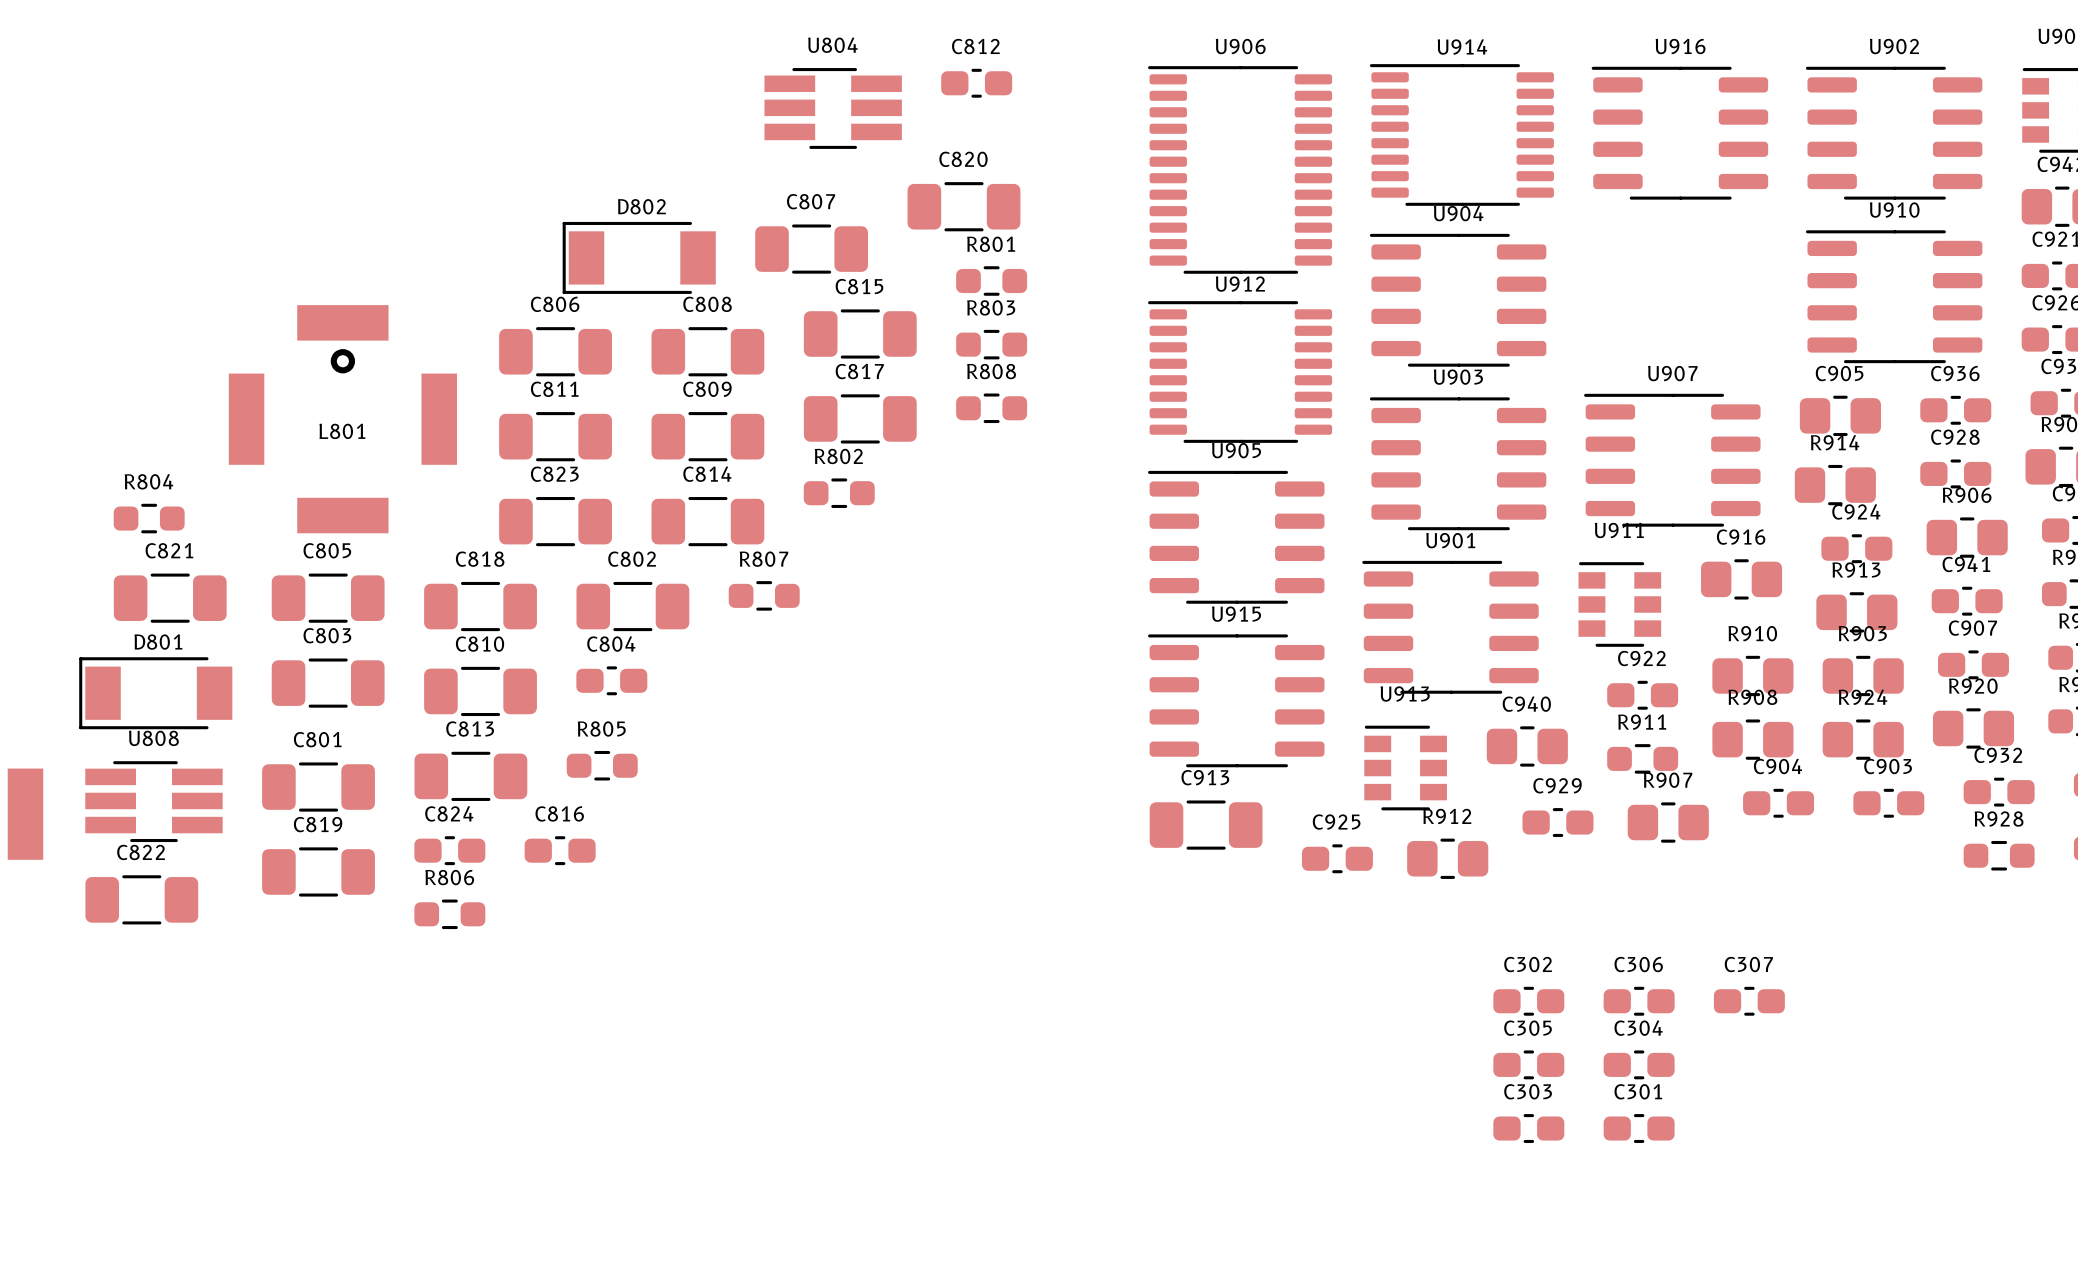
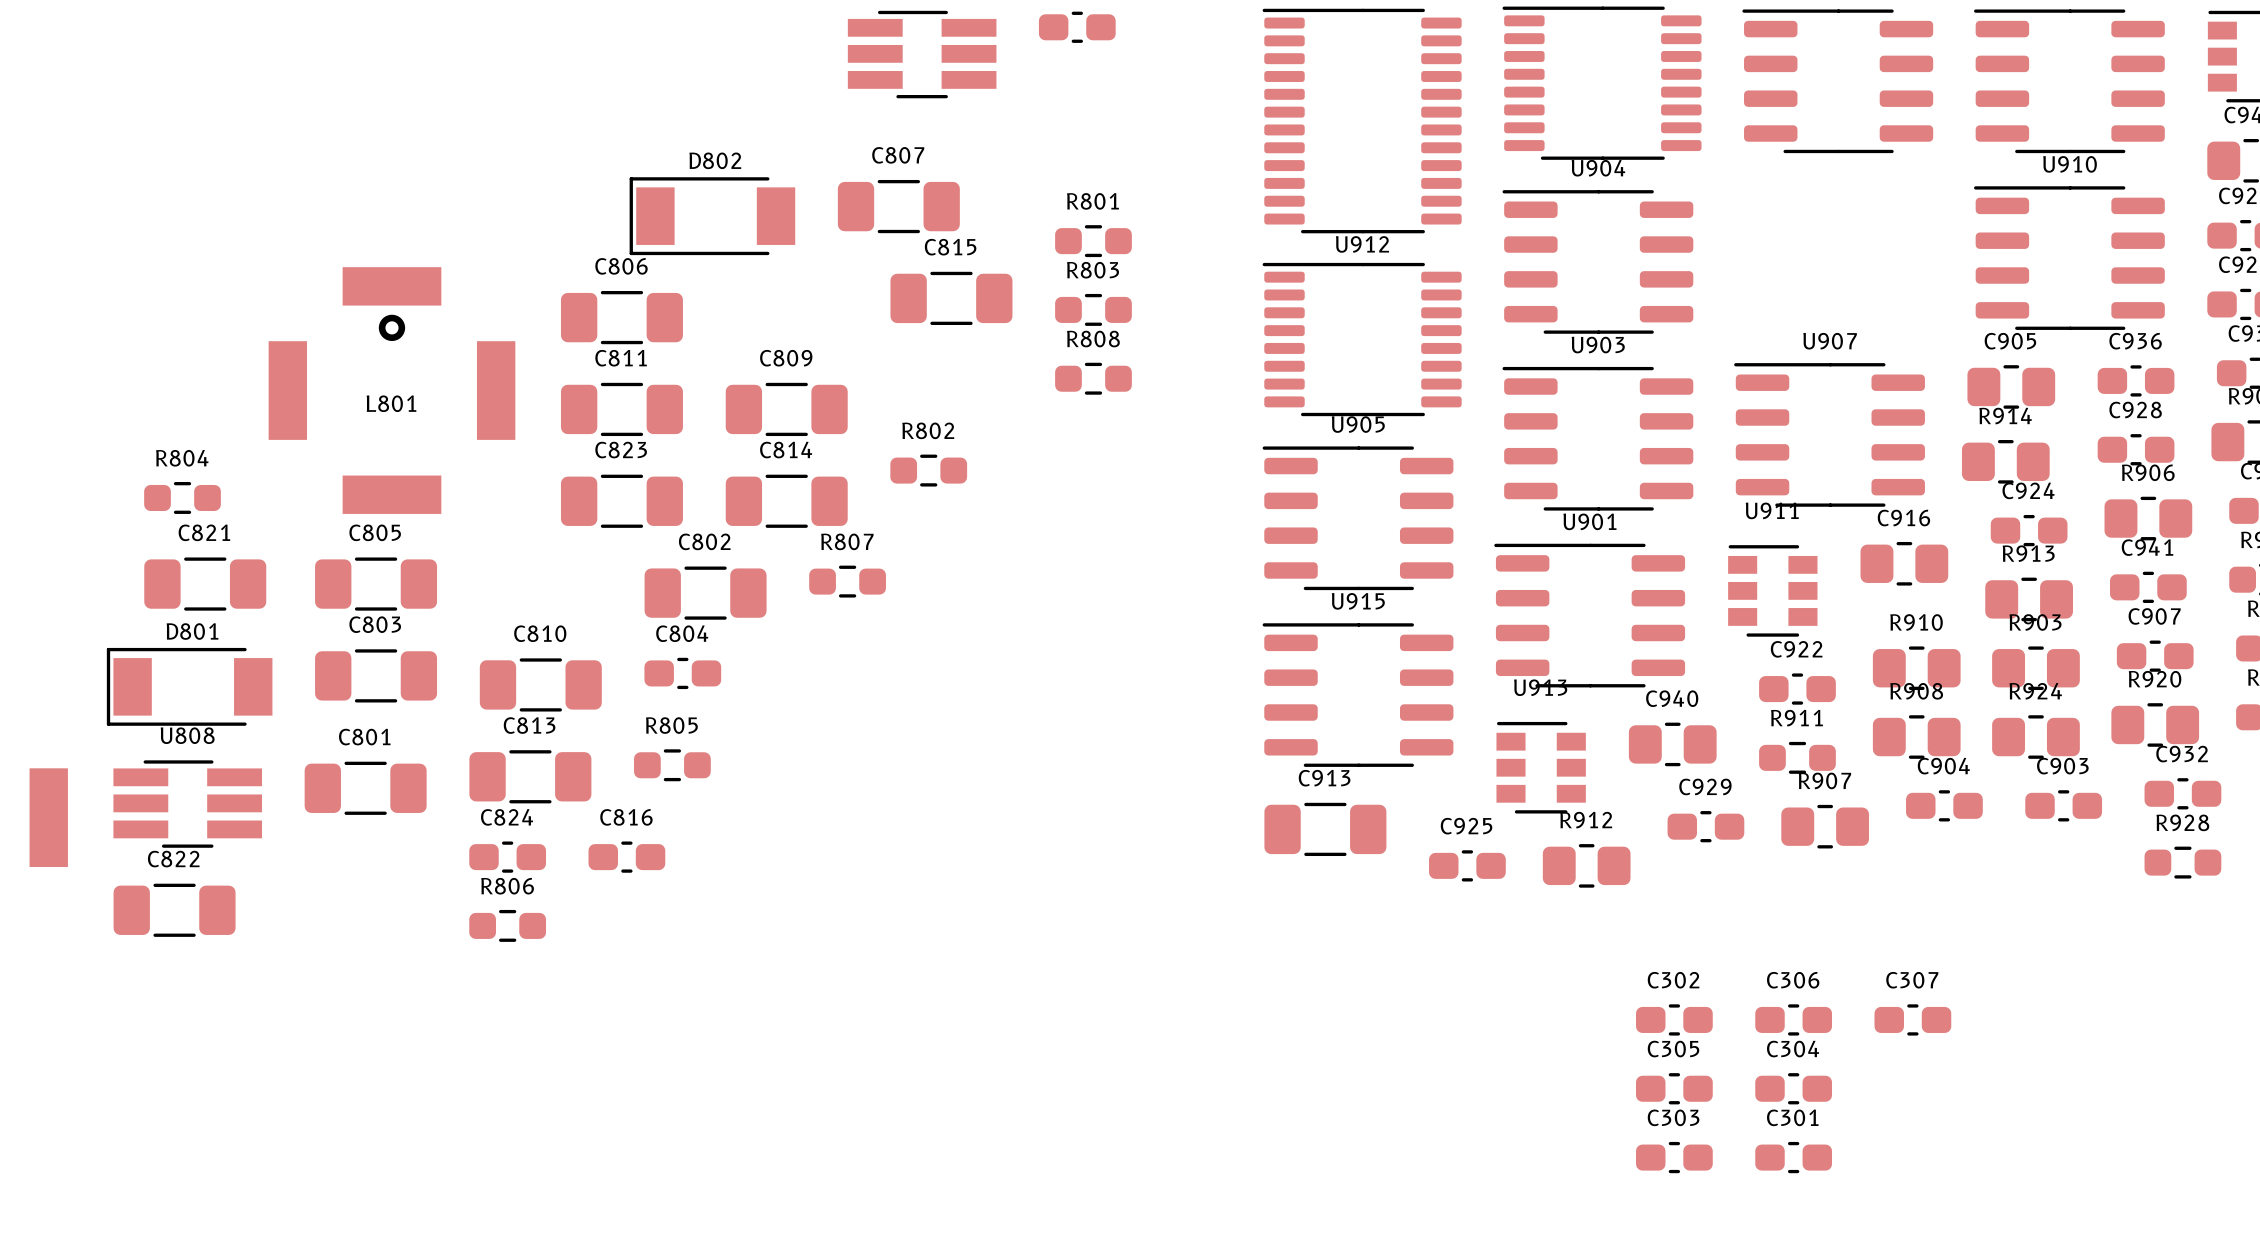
C820: (963, 206) -> none
C808: (707, 351) -> none
C817: (860, 418) -> none
C818: (480, 606) -> none
C819: (318, 871) -> none

